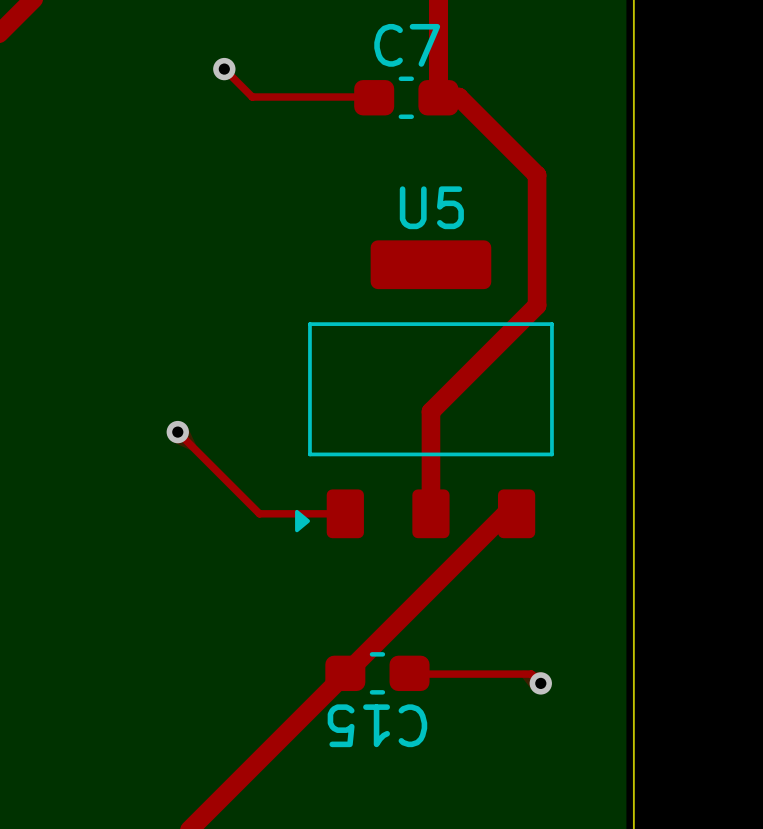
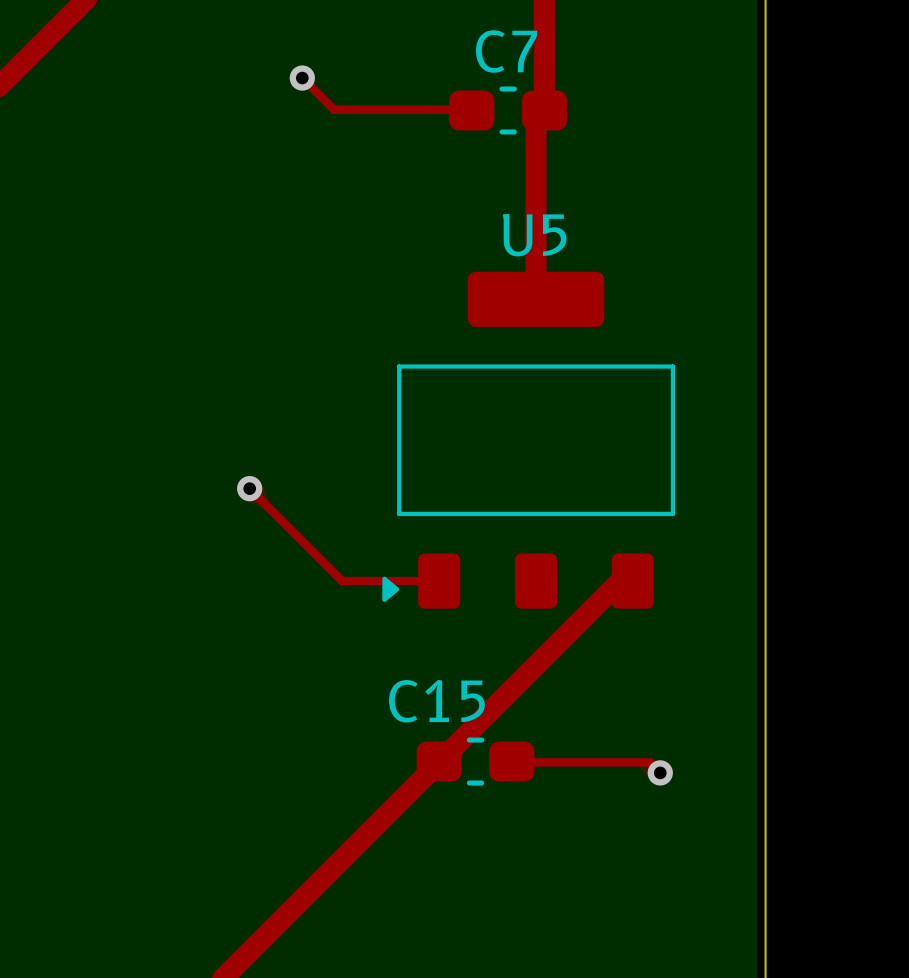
top track: (438, 97) (458, 97) (537, 175) (537, 305) (430, 411) (430, 513) -> (544, 109) (536, 118) (536, 299)
C15 name rotation: 0° (377, 725) -> 180° (436, 701)

